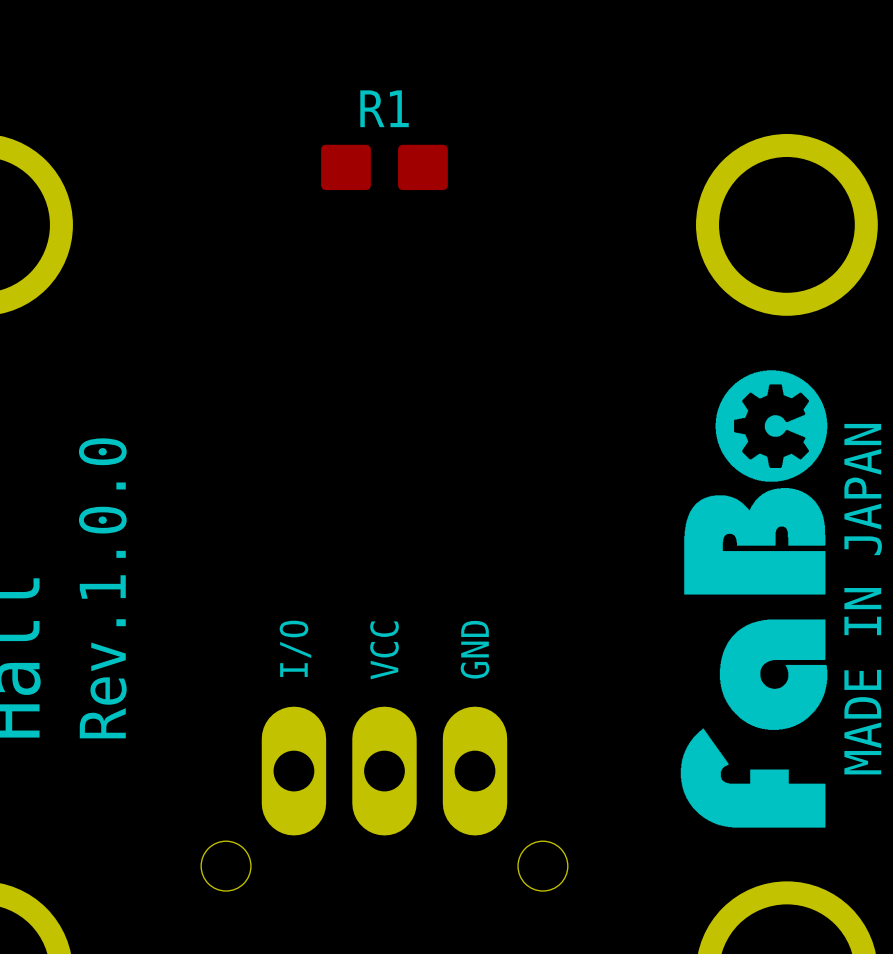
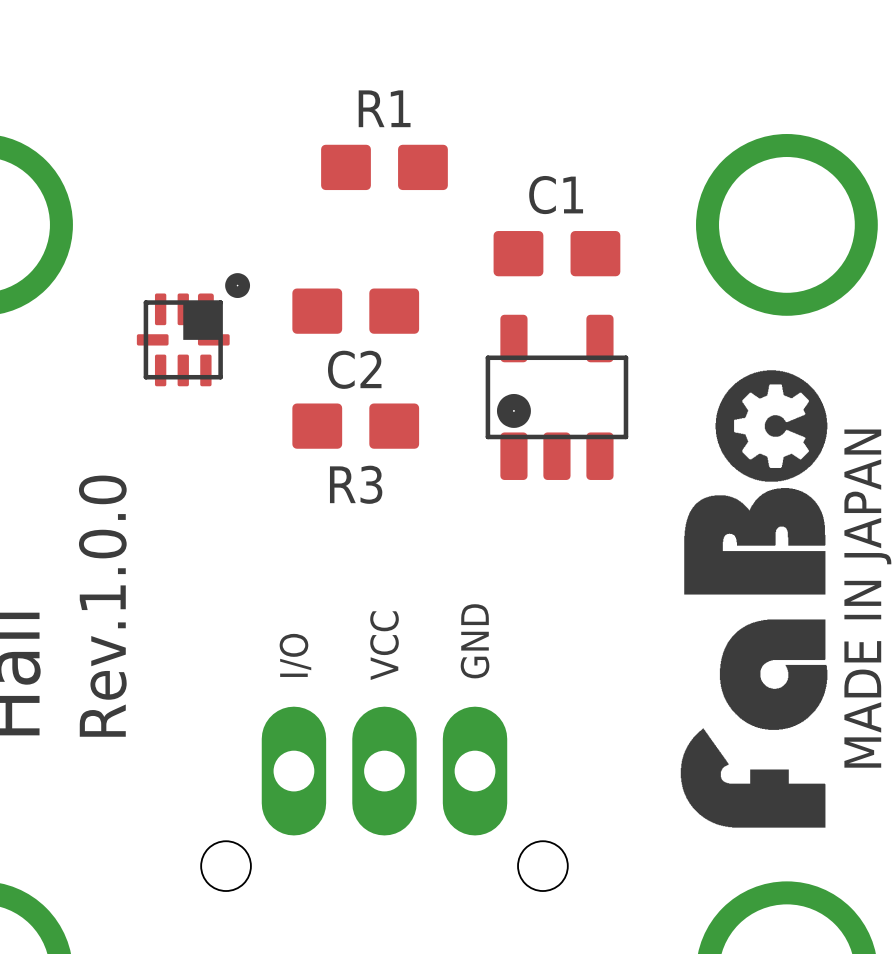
C1: none -> (556, 253)
C2: none -> (355, 311)
part: none -> (193, 329)
part: none -> (556, 397)
R3: none -> (355, 426)

